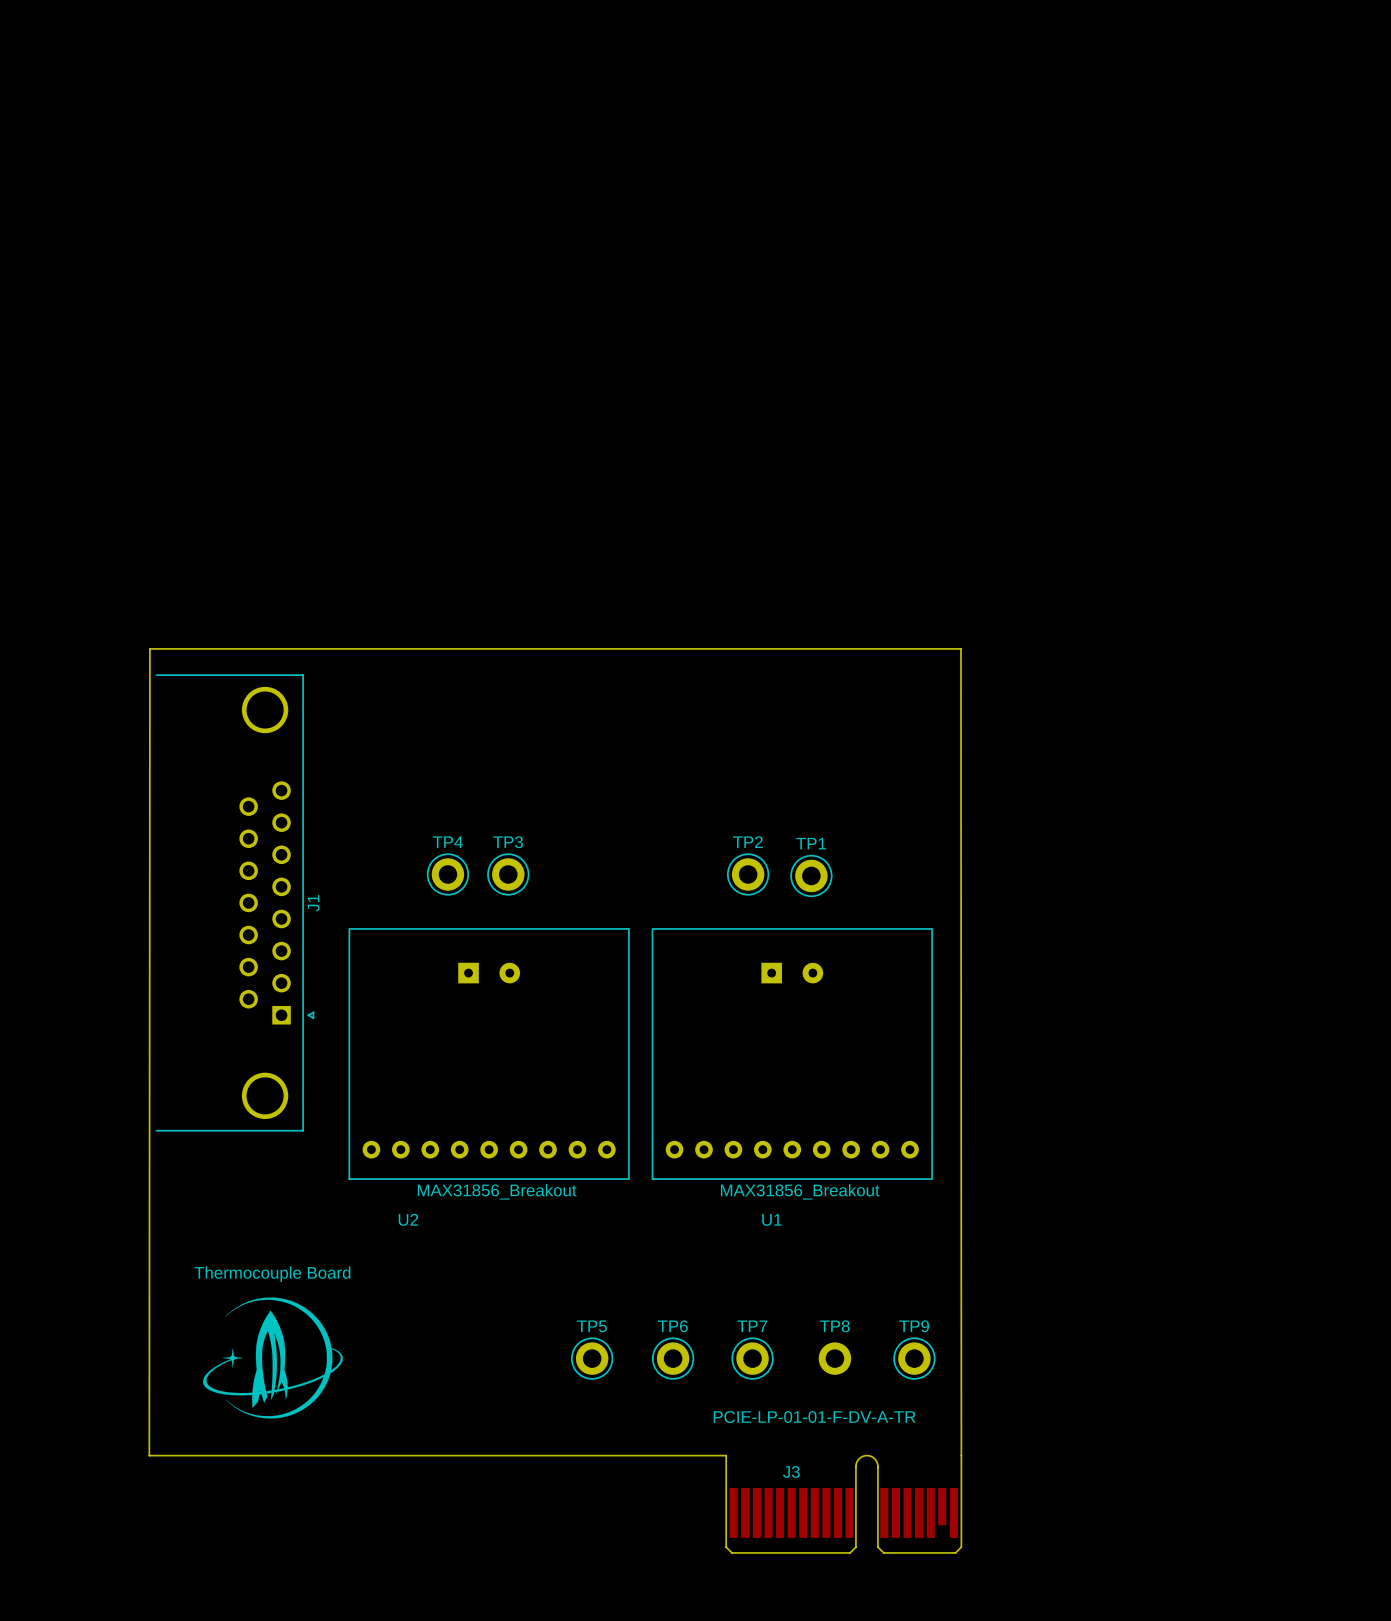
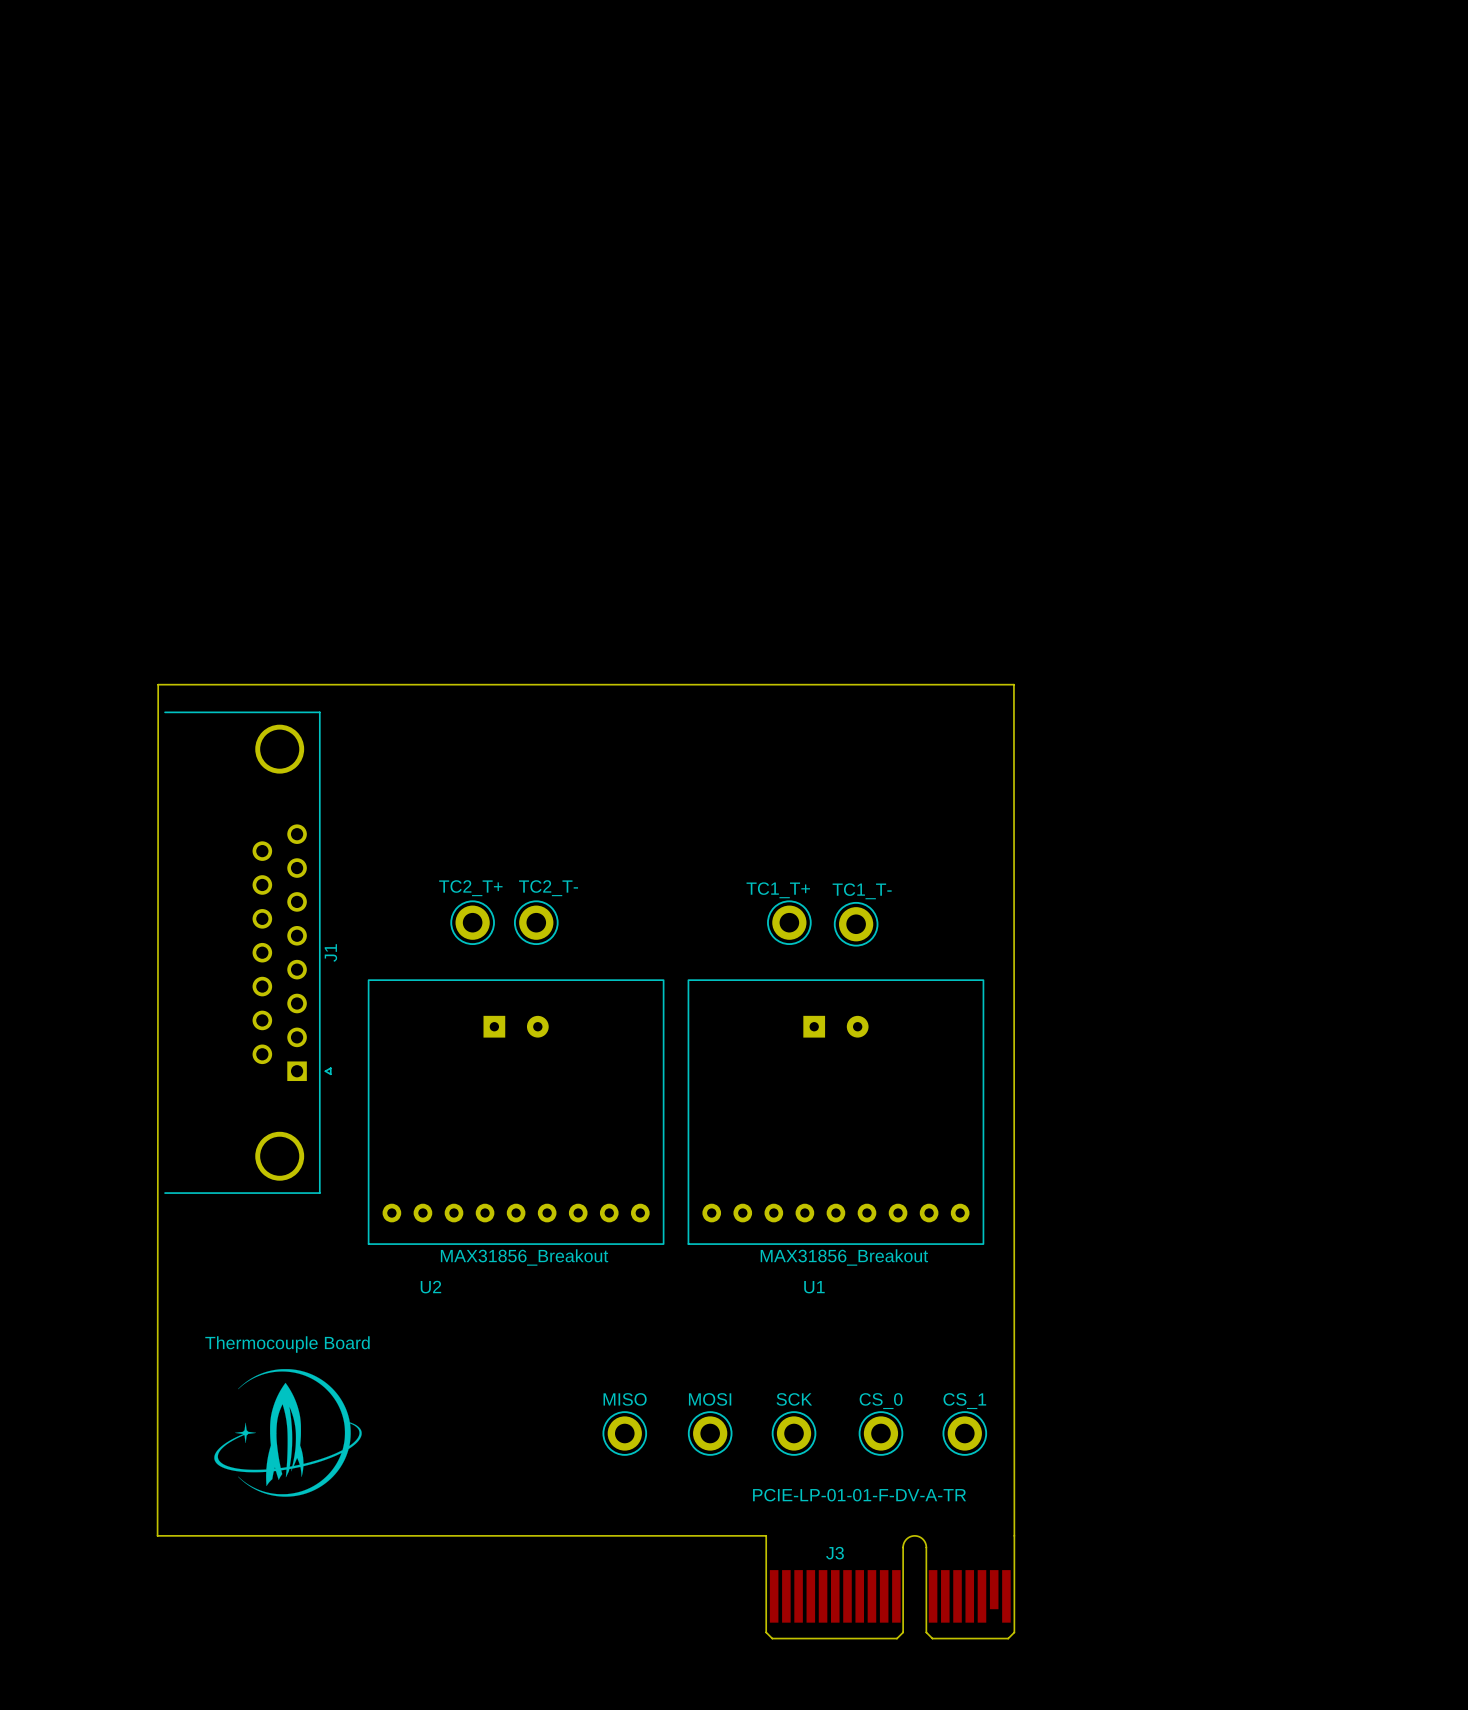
TP4 name: TP4 (447, 842) -> TC2_T+ (470, 888)
TP3 name: TP3 (508, 842) -> TC2_T- (548, 888)
TP2 name: TP2 (747, 842) -> TC1_T+ (778, 890)
TP1 name: TP1 (811, 843) -> TC1_T- (862, 891)
TP5 name: TP5 (591, 1326) -> MISO (625, 1399)
TP6 name: TP6 (672, 1326) -> MOSI (710, 1399)
TP7 name: TP7 (752, 1326) -> SCK (794, 1399)
TP8 name: TP8 (834, 1326) -> CS_0 (881, 1401)
TP9 name: TP9 (914, 1326) -> CS_1 (964, 1401)
TP8 side: bottom (834, 1358) -> top (880, 1433)

